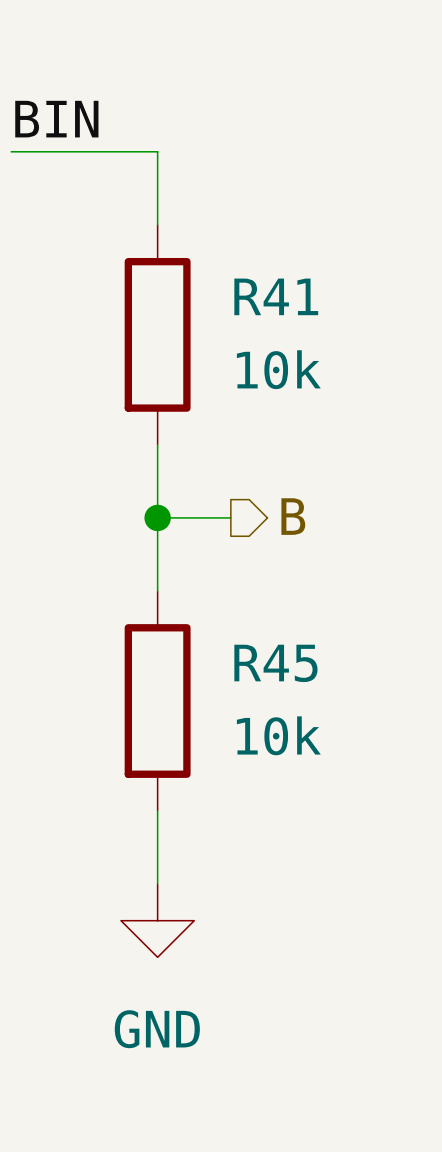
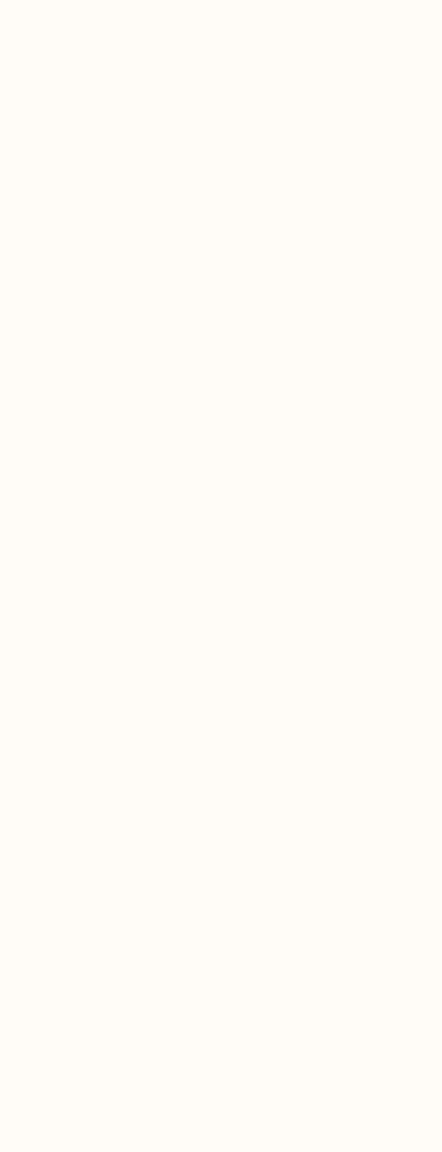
label: BIN (56, 119) -> none
wire: (11, 151) (157, 151) (157, 225) -> none
R41: 10k (157, 334) -> none
wire: (157, 444) (157, 591) -> none
hierarchical label: B (293, 516) -> none
wire: (157, 517) (230, 517) -> none
junction: (157, 517) -> none
R45: 10k (157, 701) -> none
wire: (157, 810) (157, 884) -> none
power symbol: GND (157, 920) -> none

